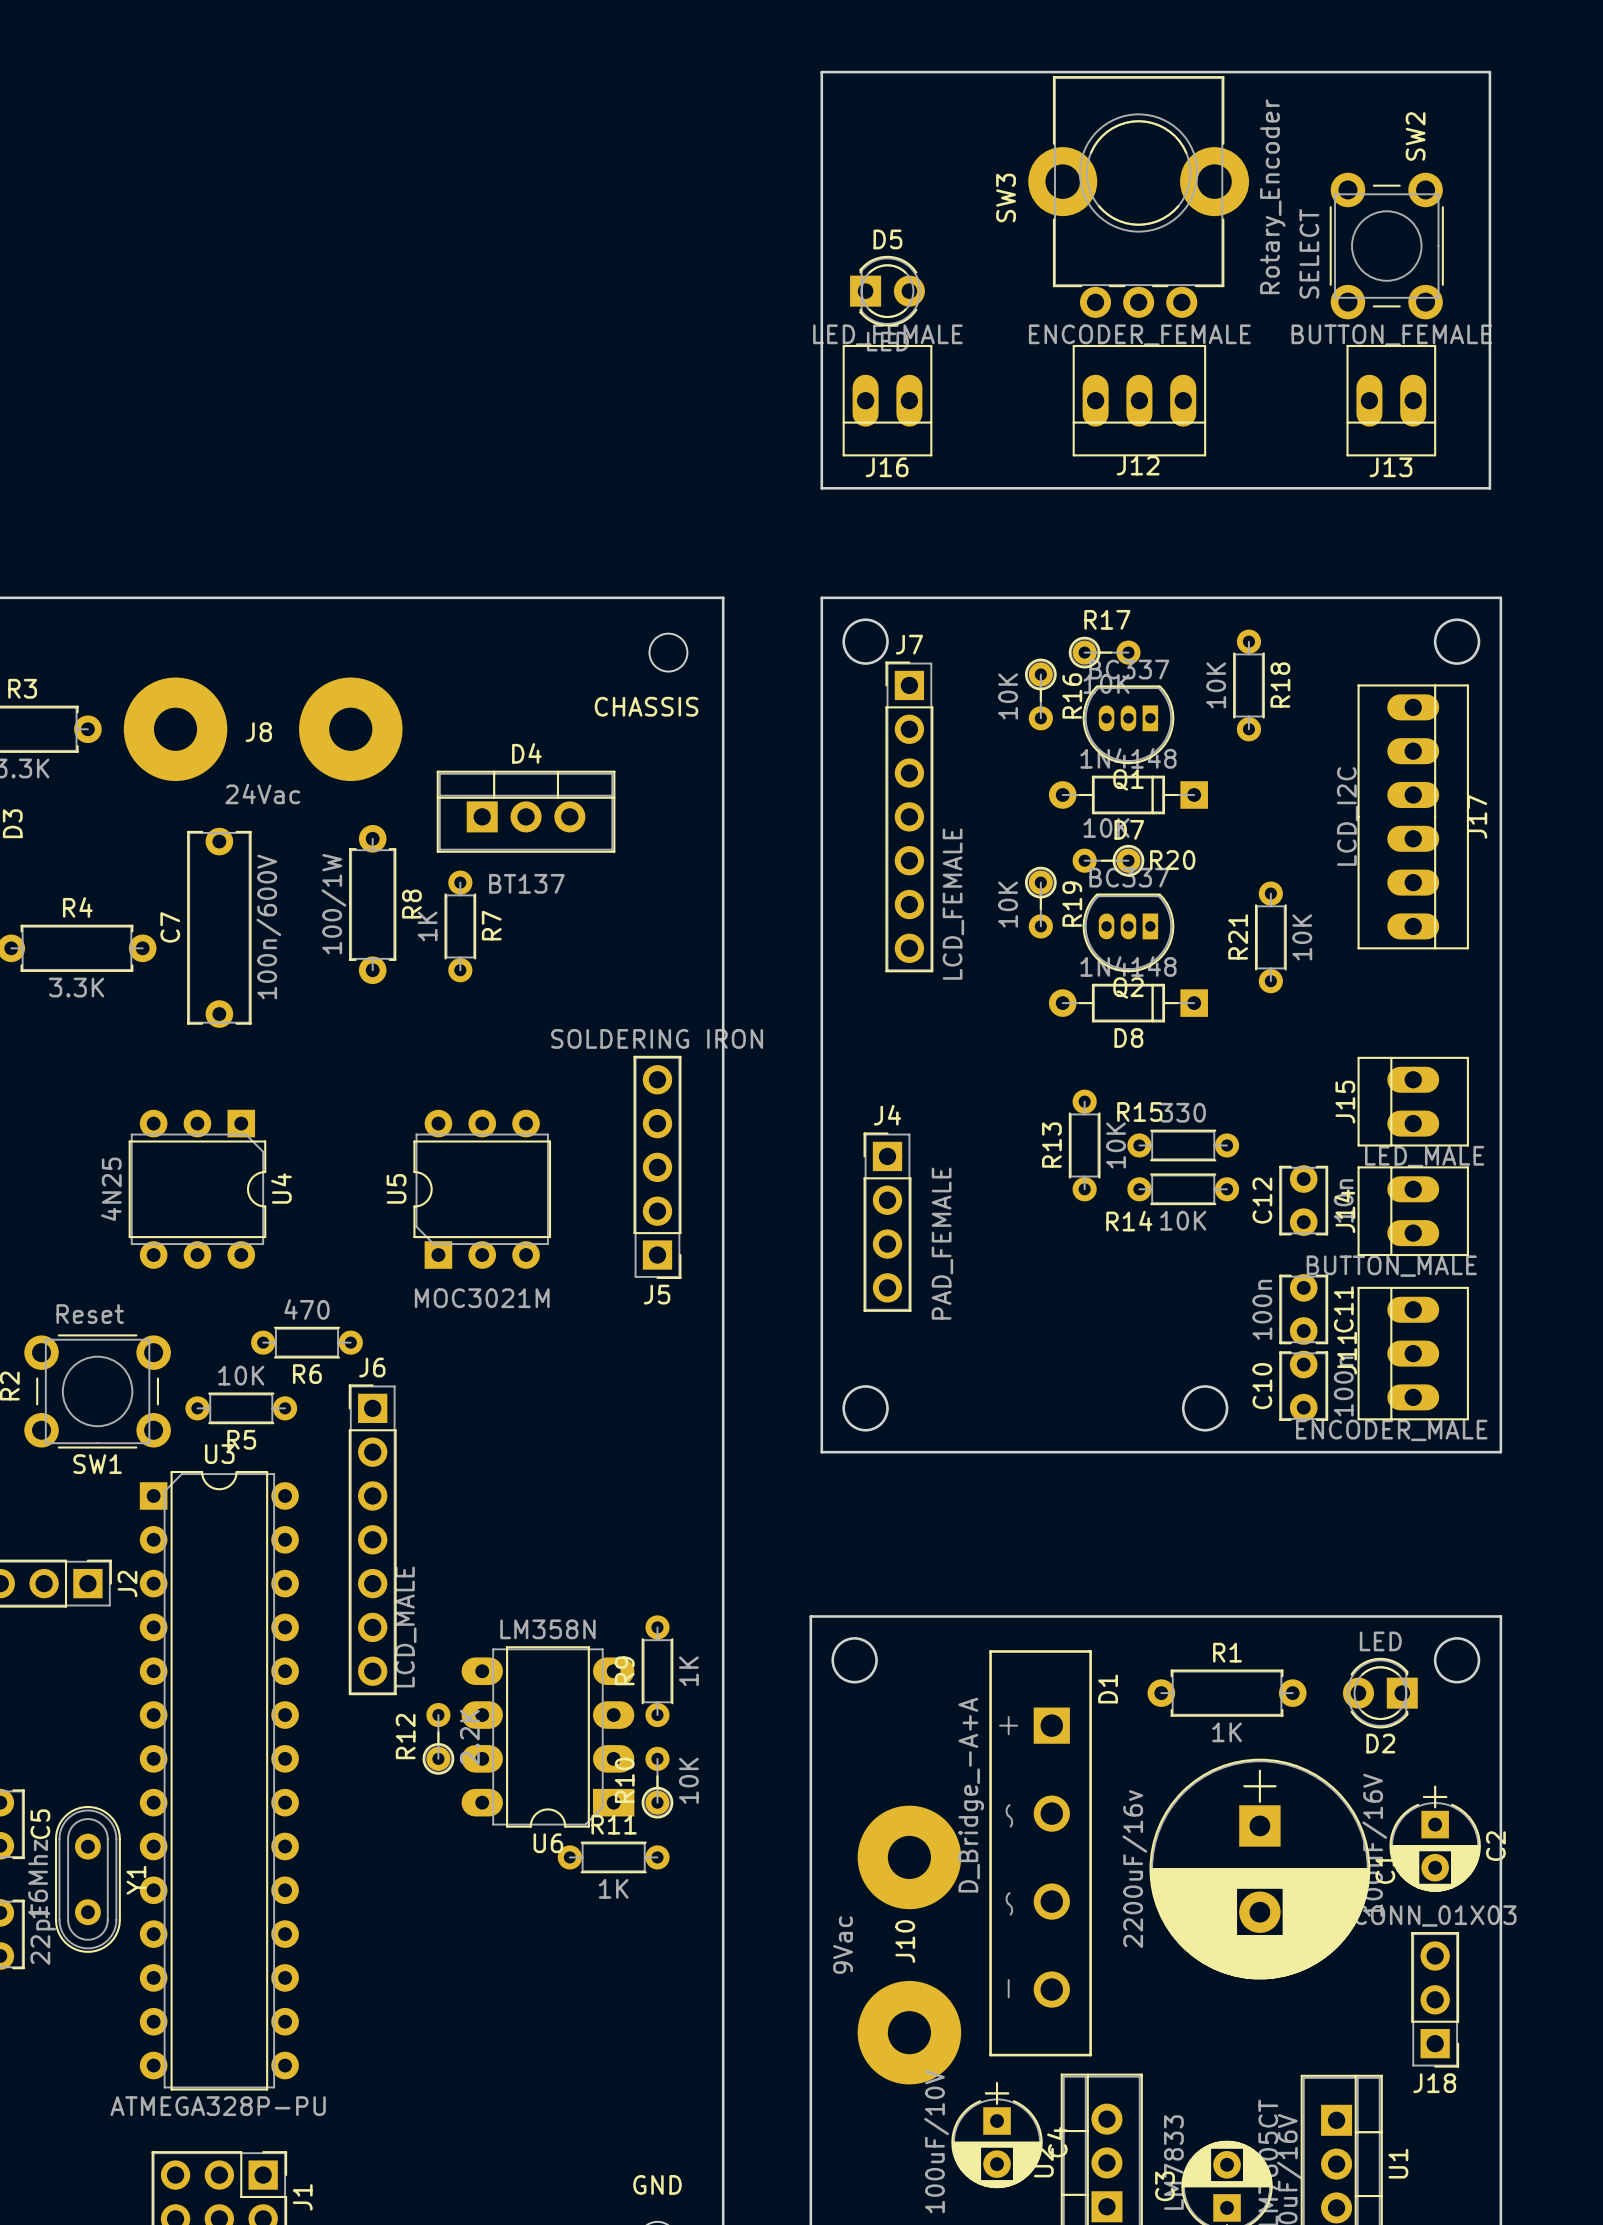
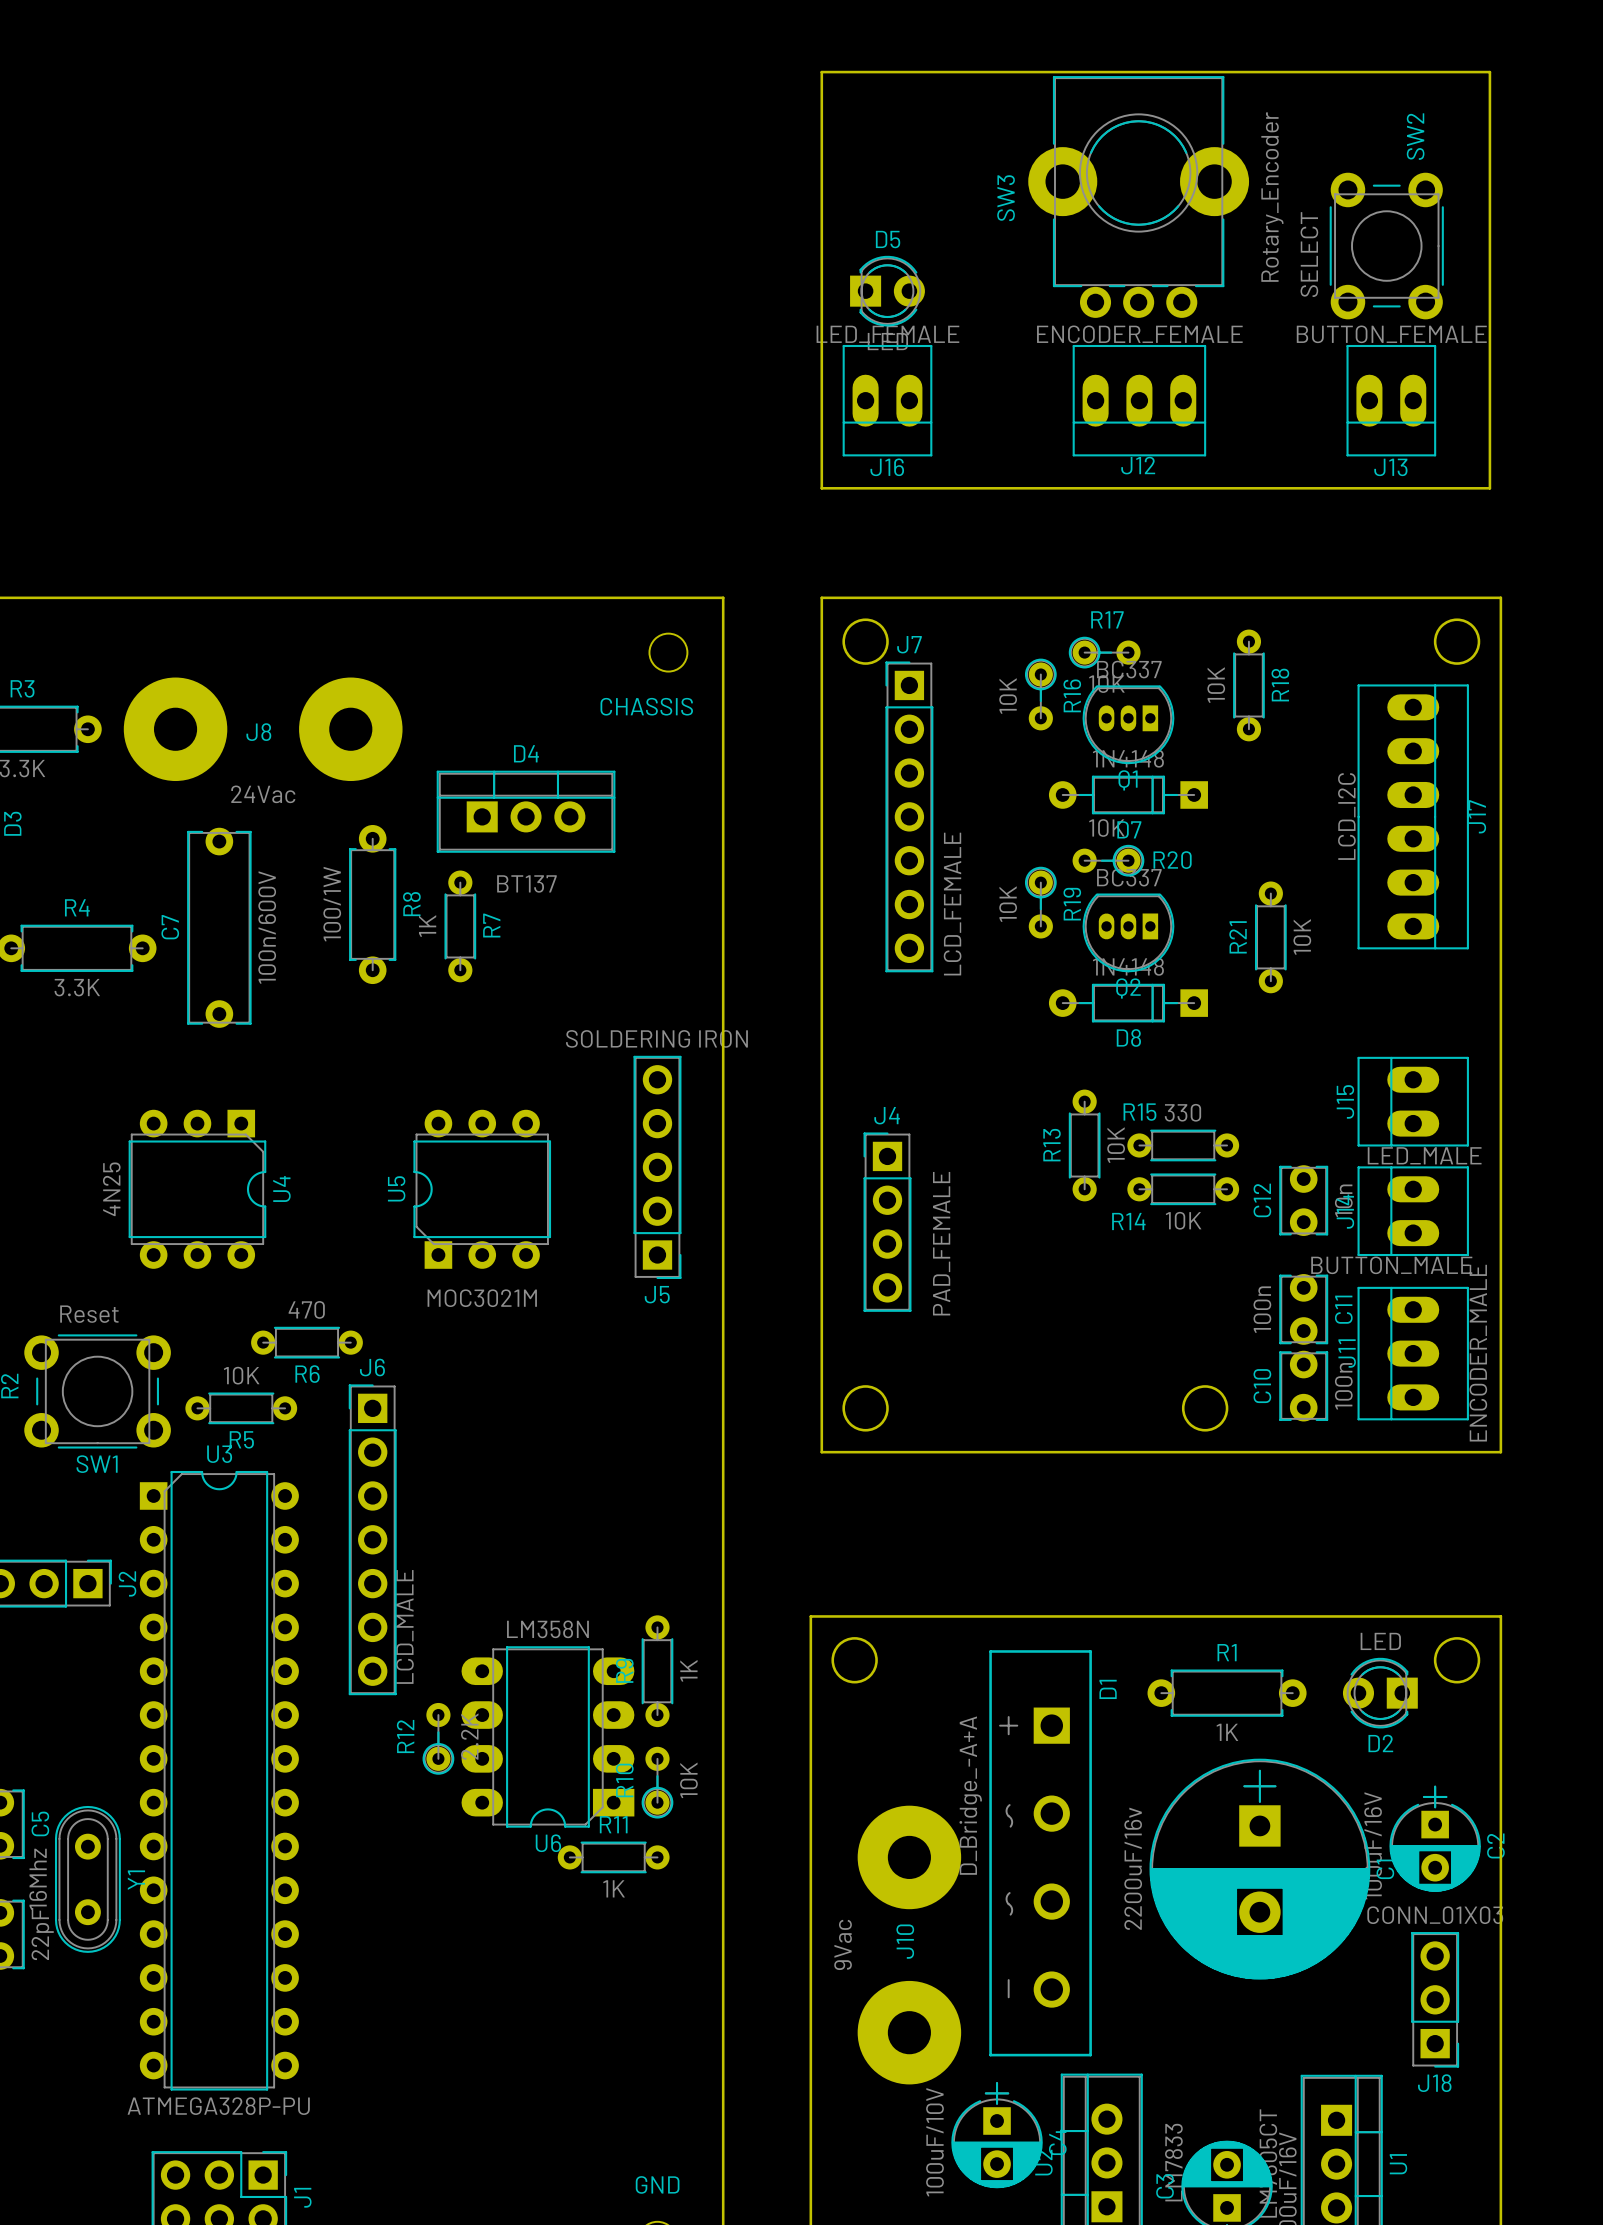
J11 value rotation: 0° (1391, 1430) -> 90° counterclockwise (1478, 1353)

